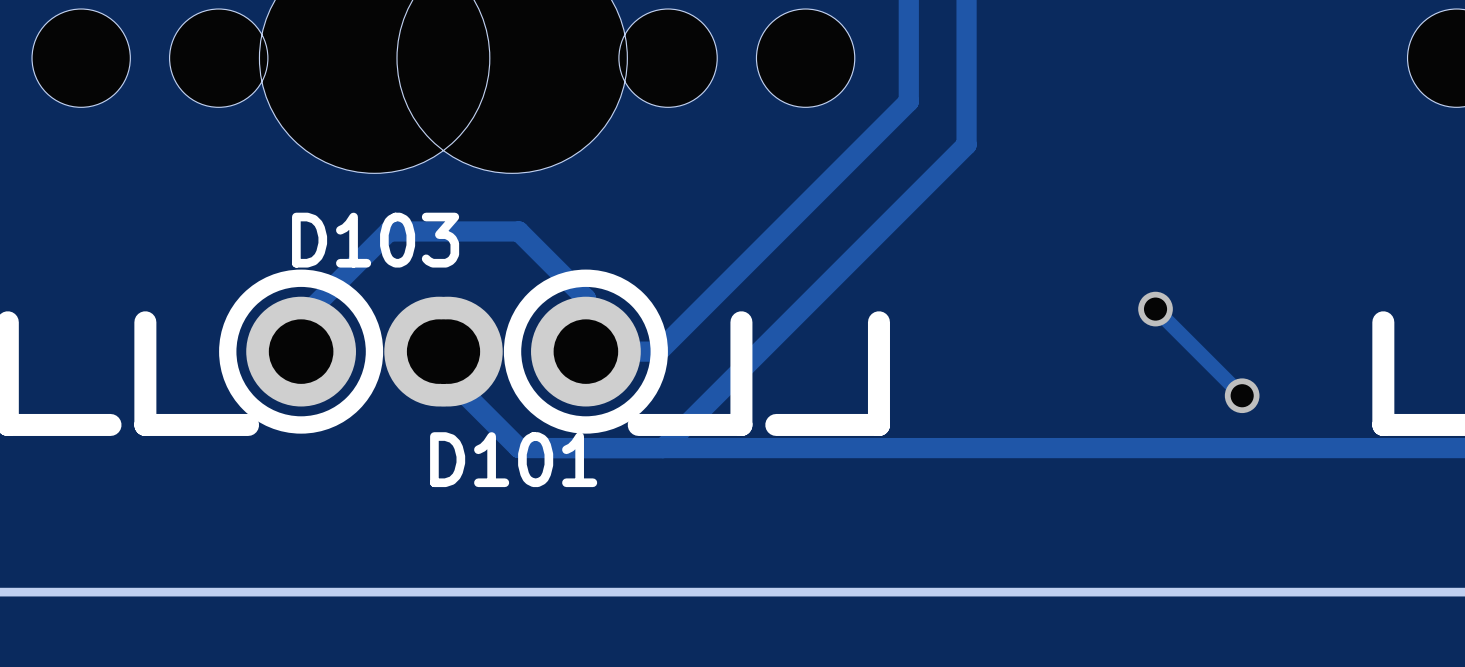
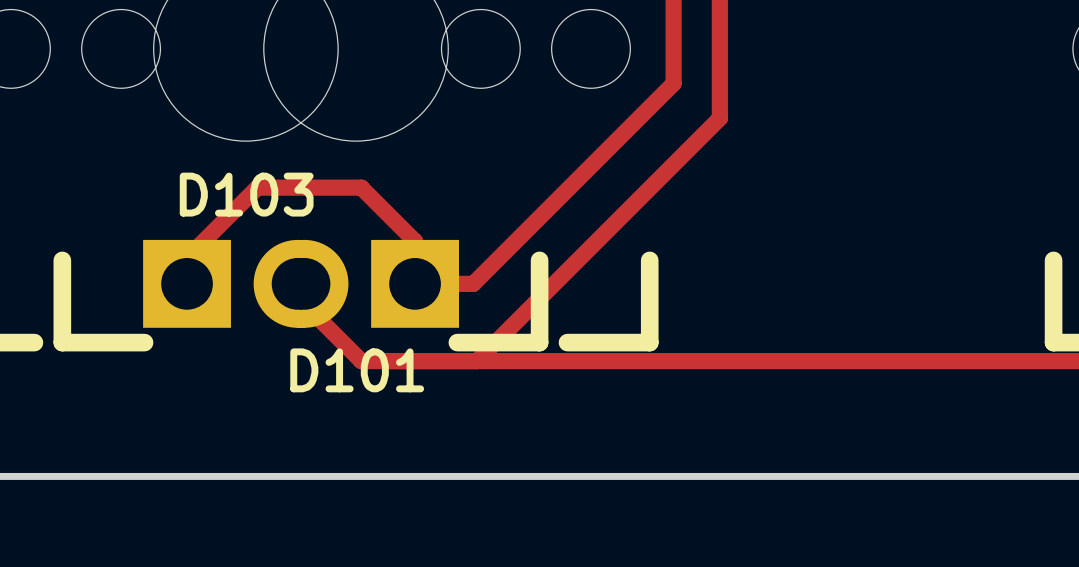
D103 footprint: [219, 269, 503, 434] -> [143, 239, 349, 328]
D101 footprint: [384, 269, 668, 434] -> [253, 239, 460, 328]
track: (1155, 309) (1242, 395) -> none
via: (1155, 309) -> none
via: (1242, 395) -> none

